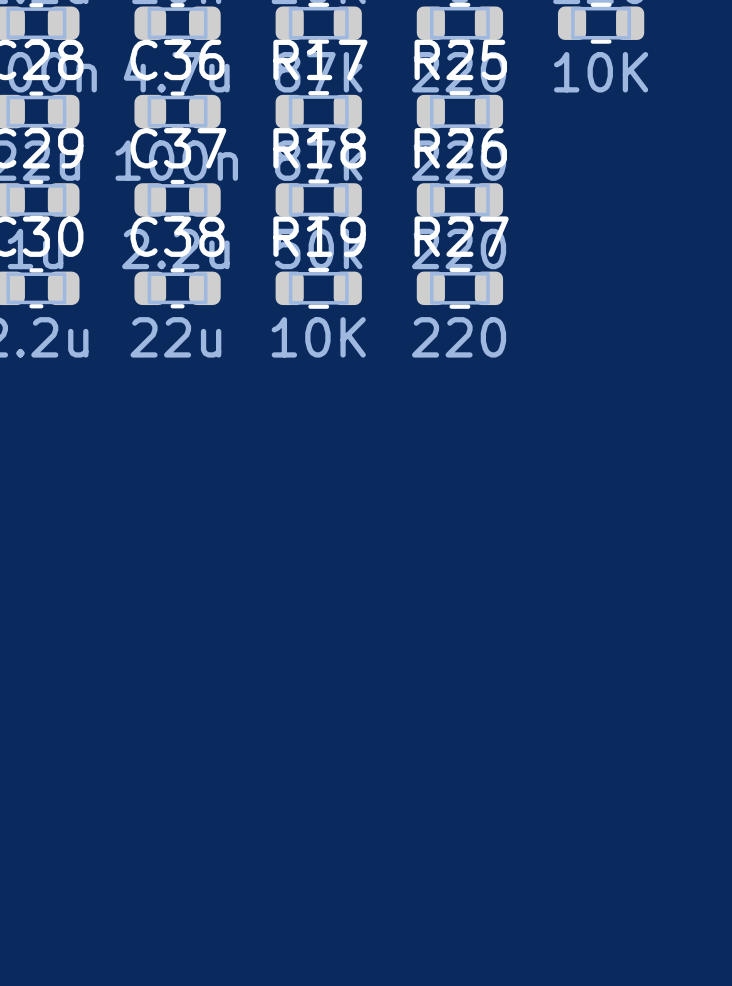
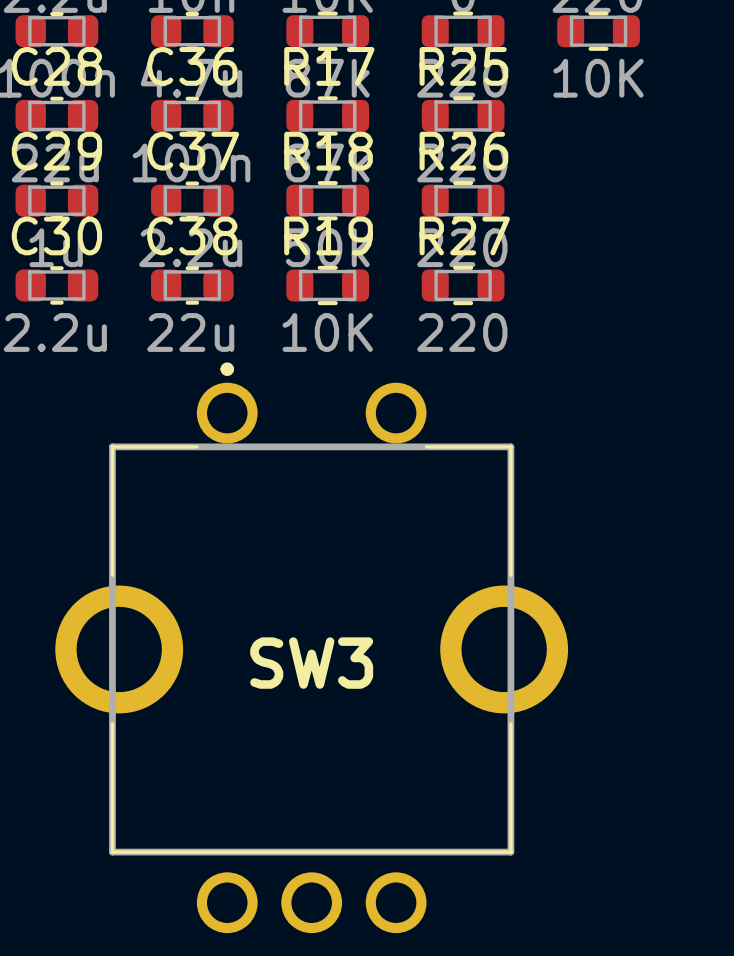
SW3: none -> (311, 647)

